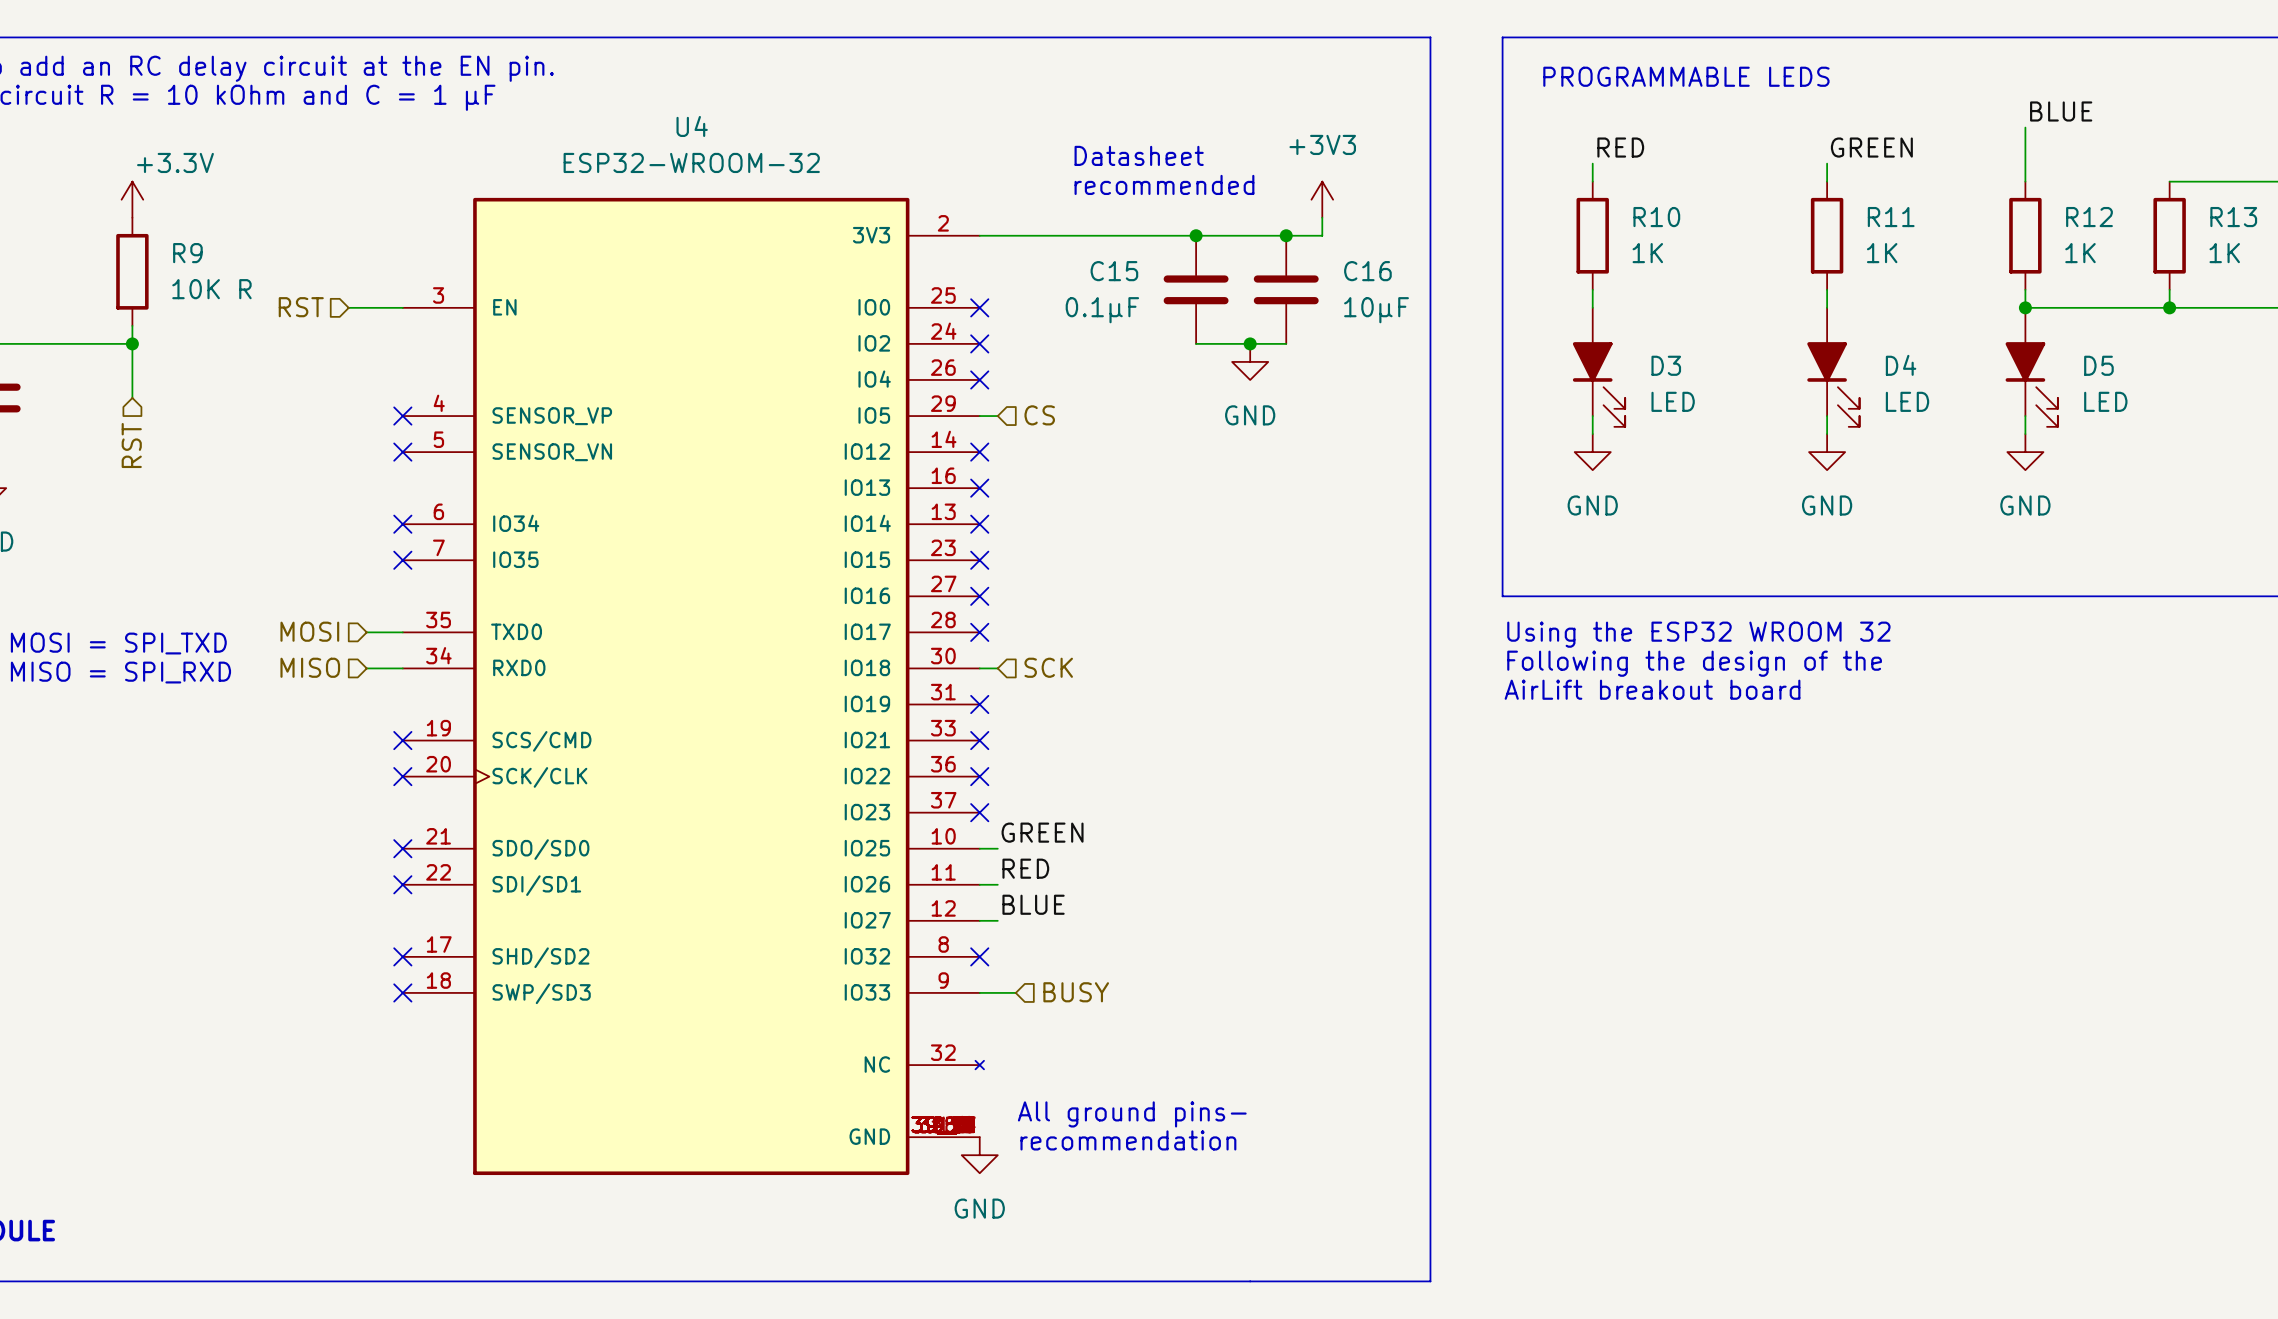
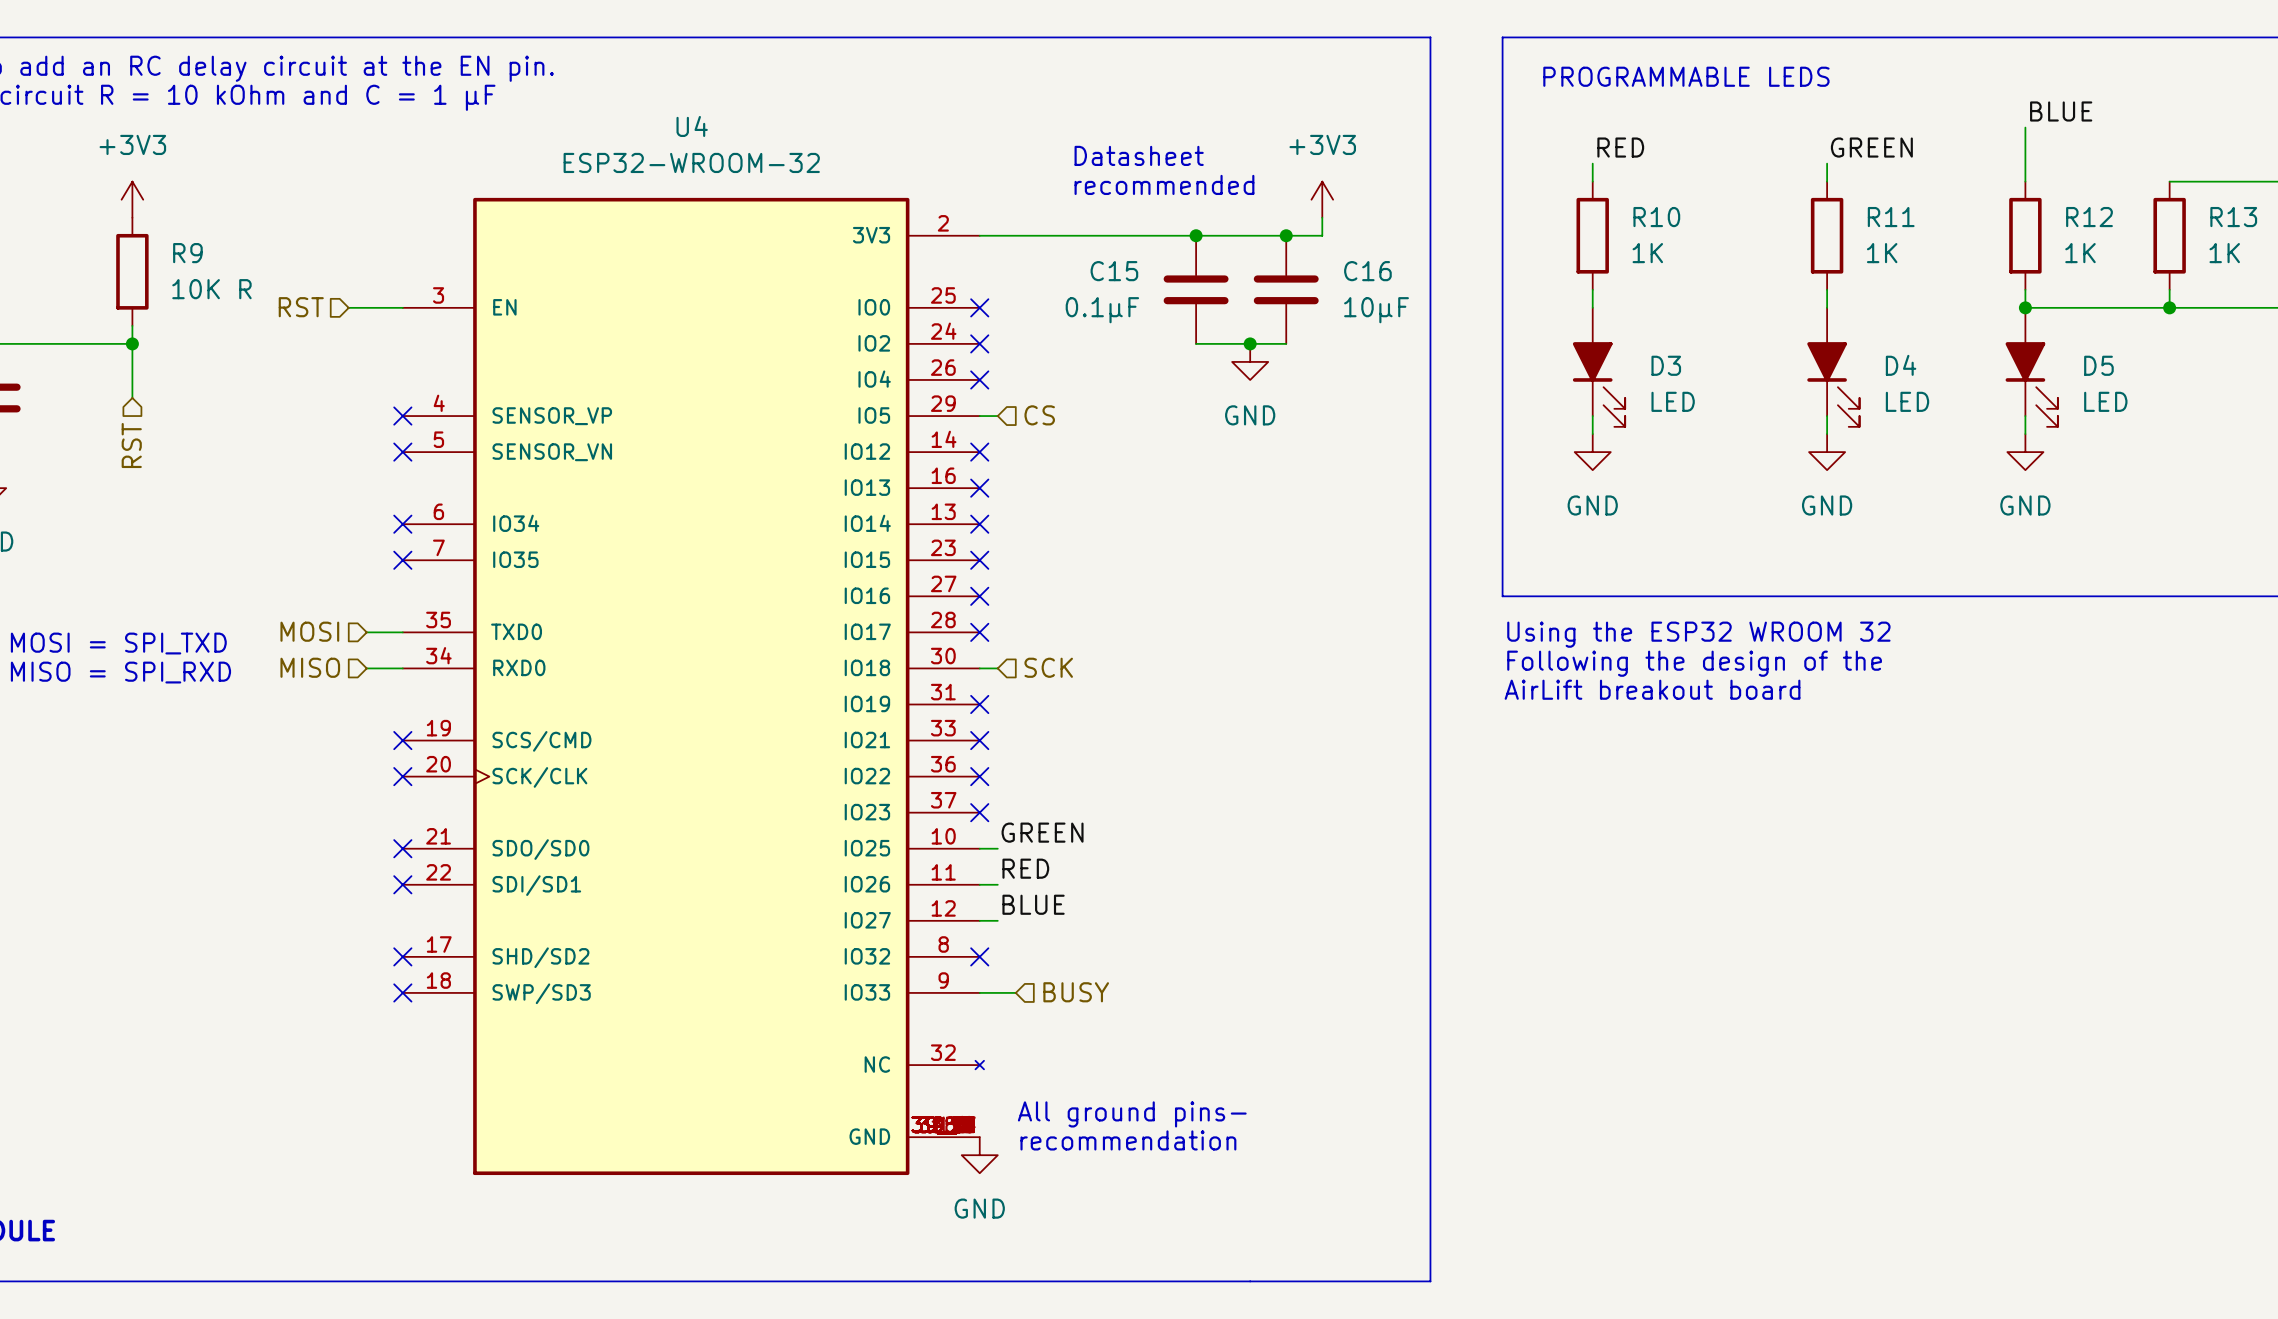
power symbol: +3.3V (132, 199) -> +3V3 (132, 199)

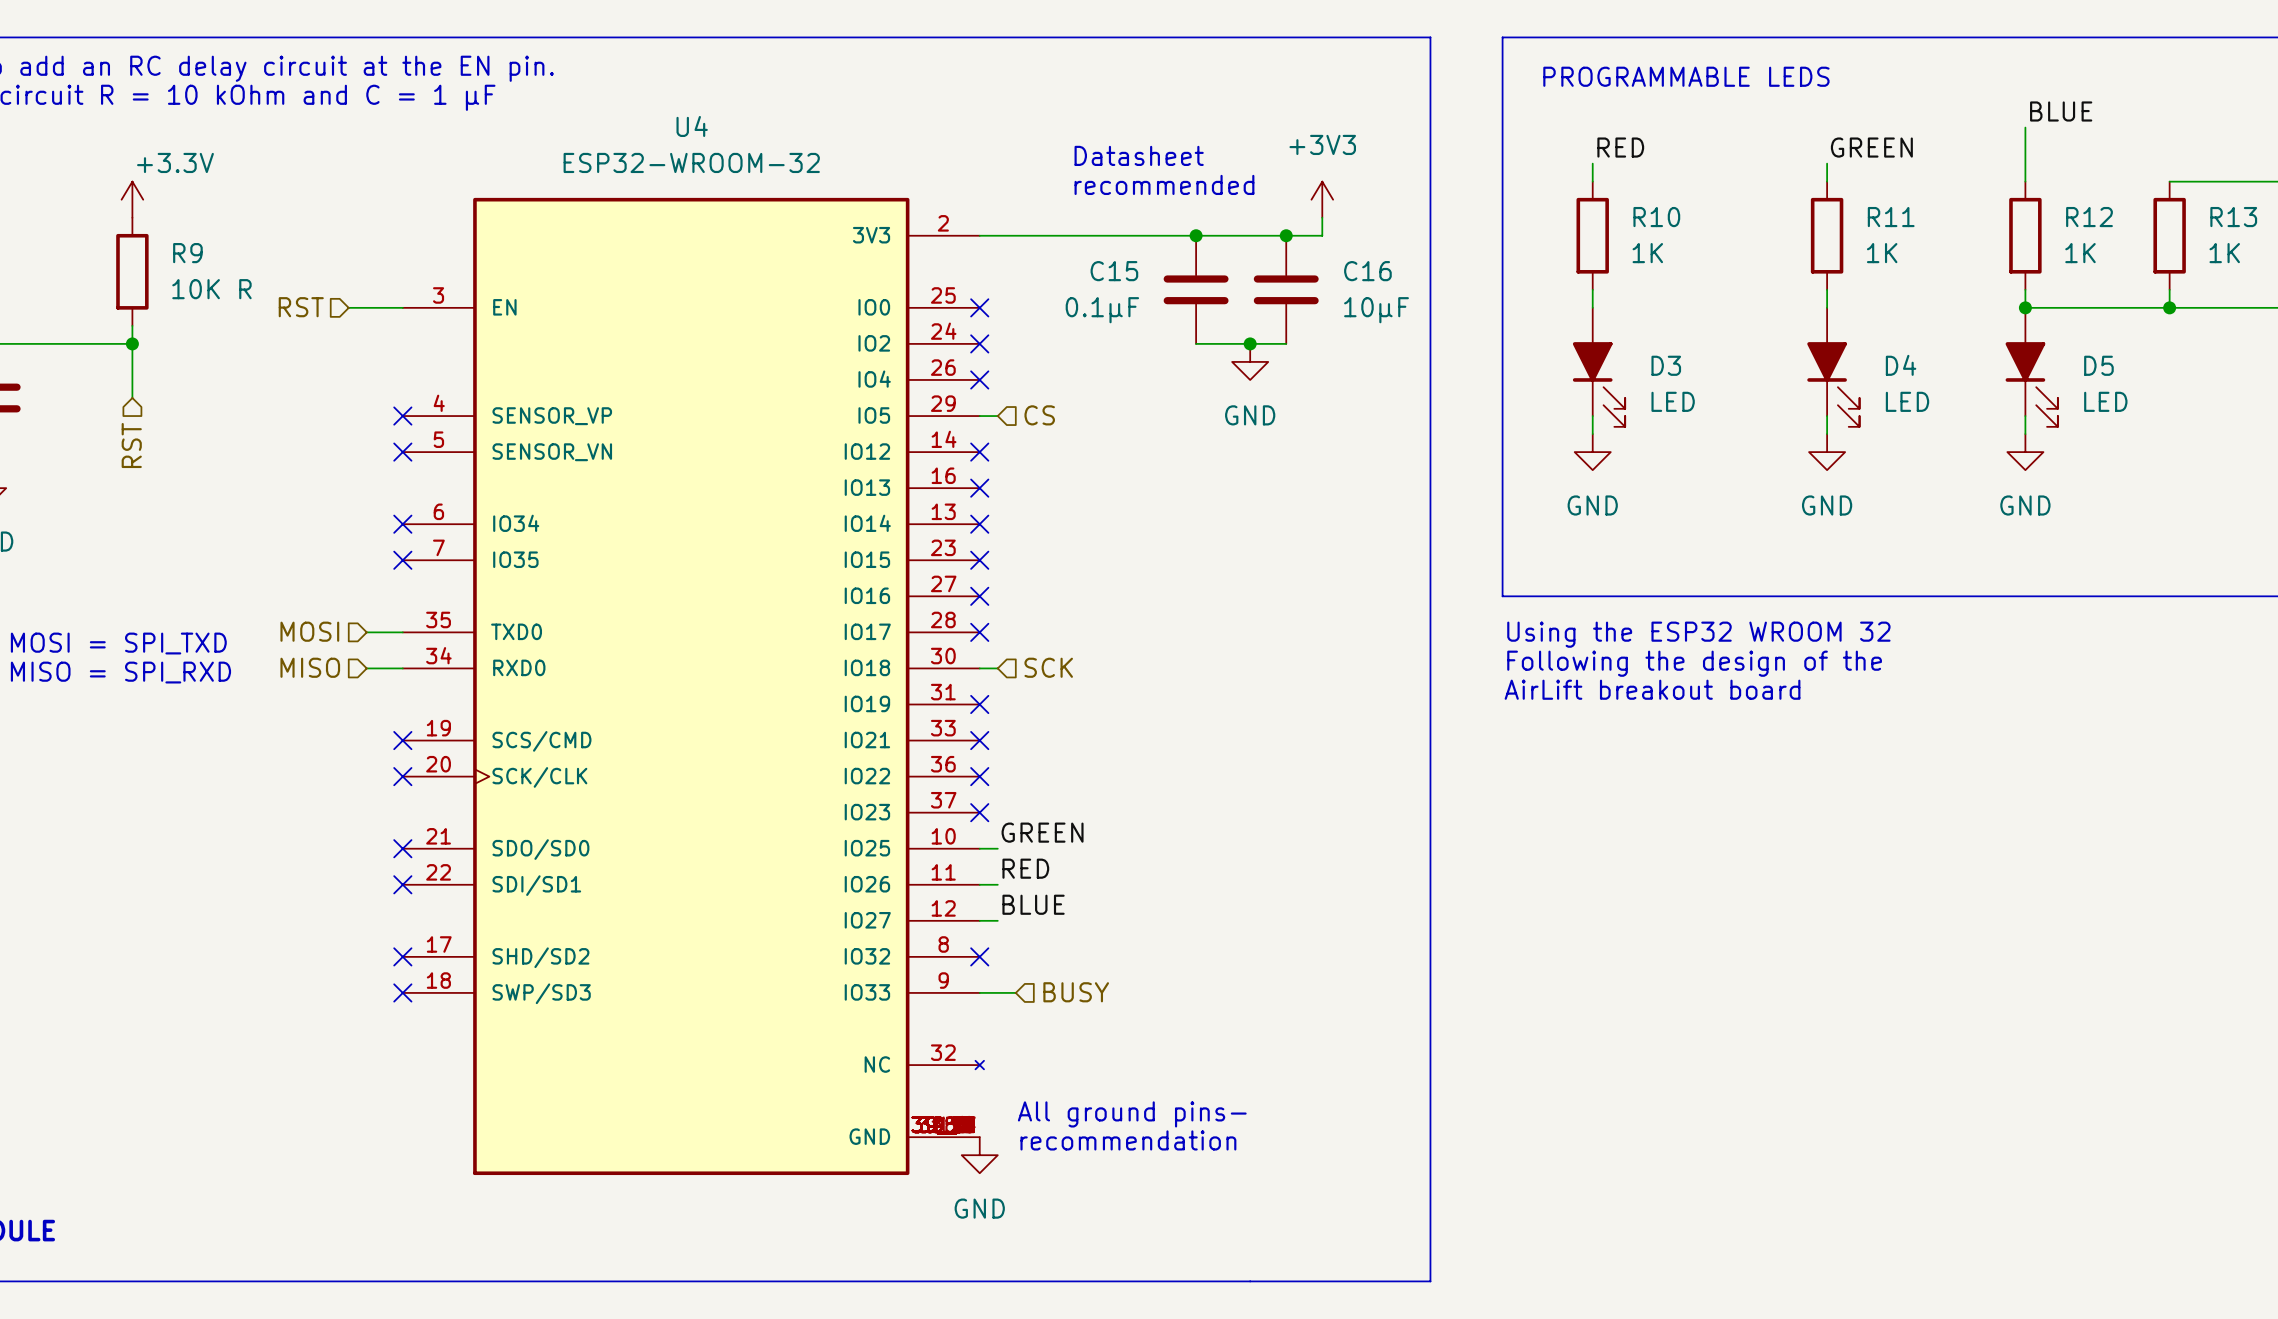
power symbol: +3V3 (132, 199) -> +3.3V (132, 199)

